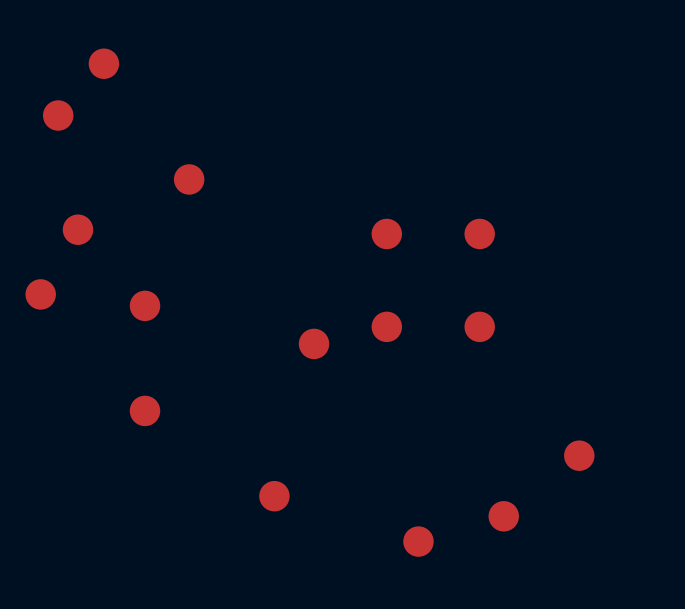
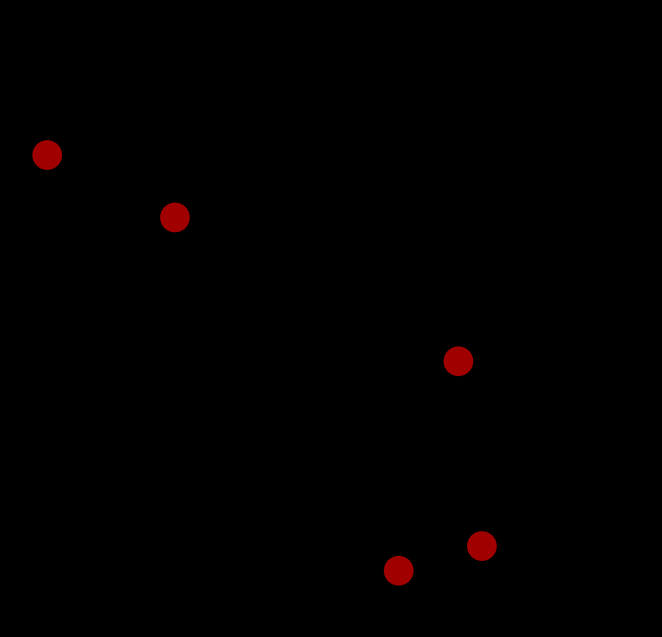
part: (103, 63) -> none
part: (78, 229) -> none
part: (386, 233) -> none
part: (479, 233) -> none
part: (40, 294) -> none
part: (145, 305) -> none
part: (386, 326) -> none
part: (314, 343) -> none
part: (145, 410) -> none
part: (579, 455) -> none
part: (274, 496) -> none

